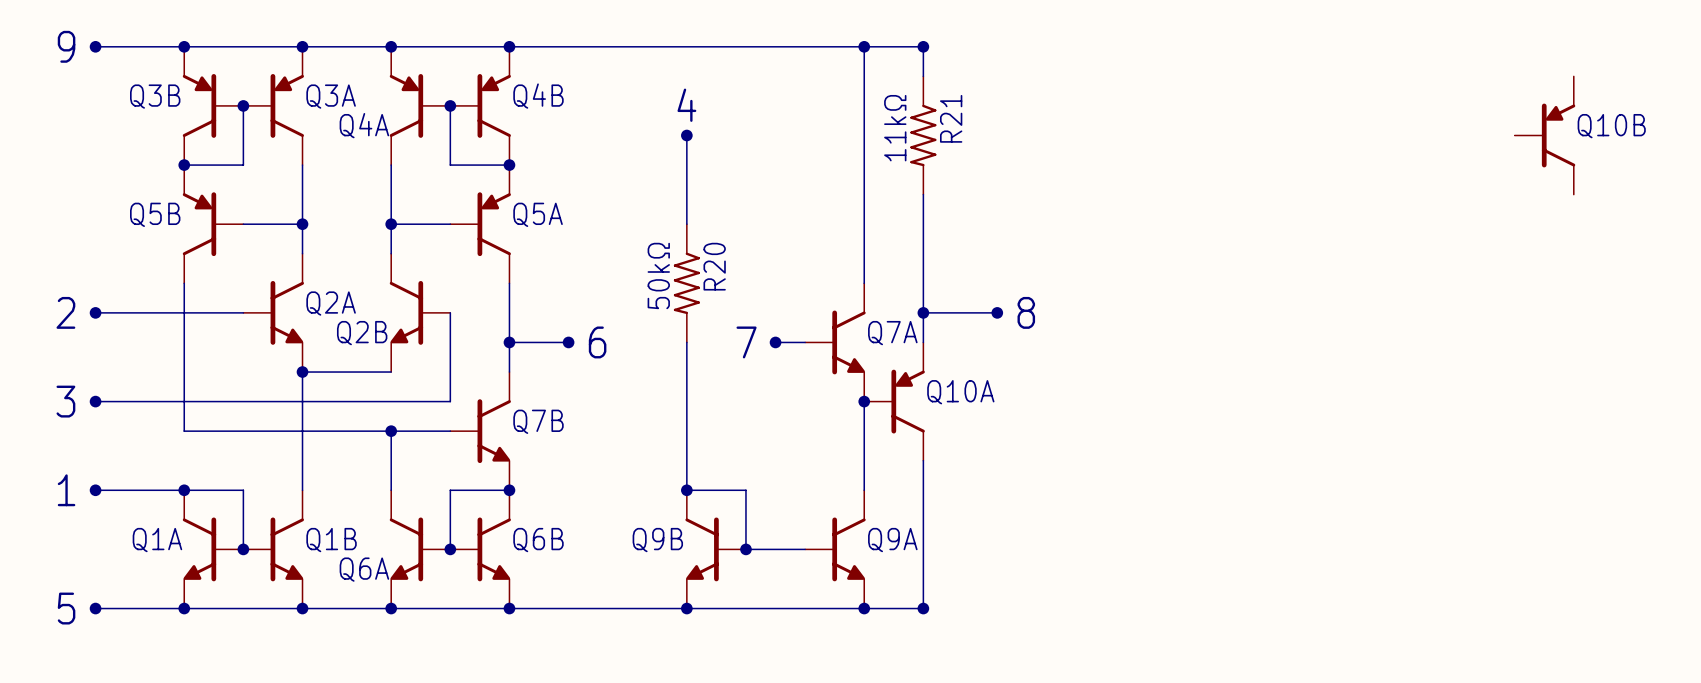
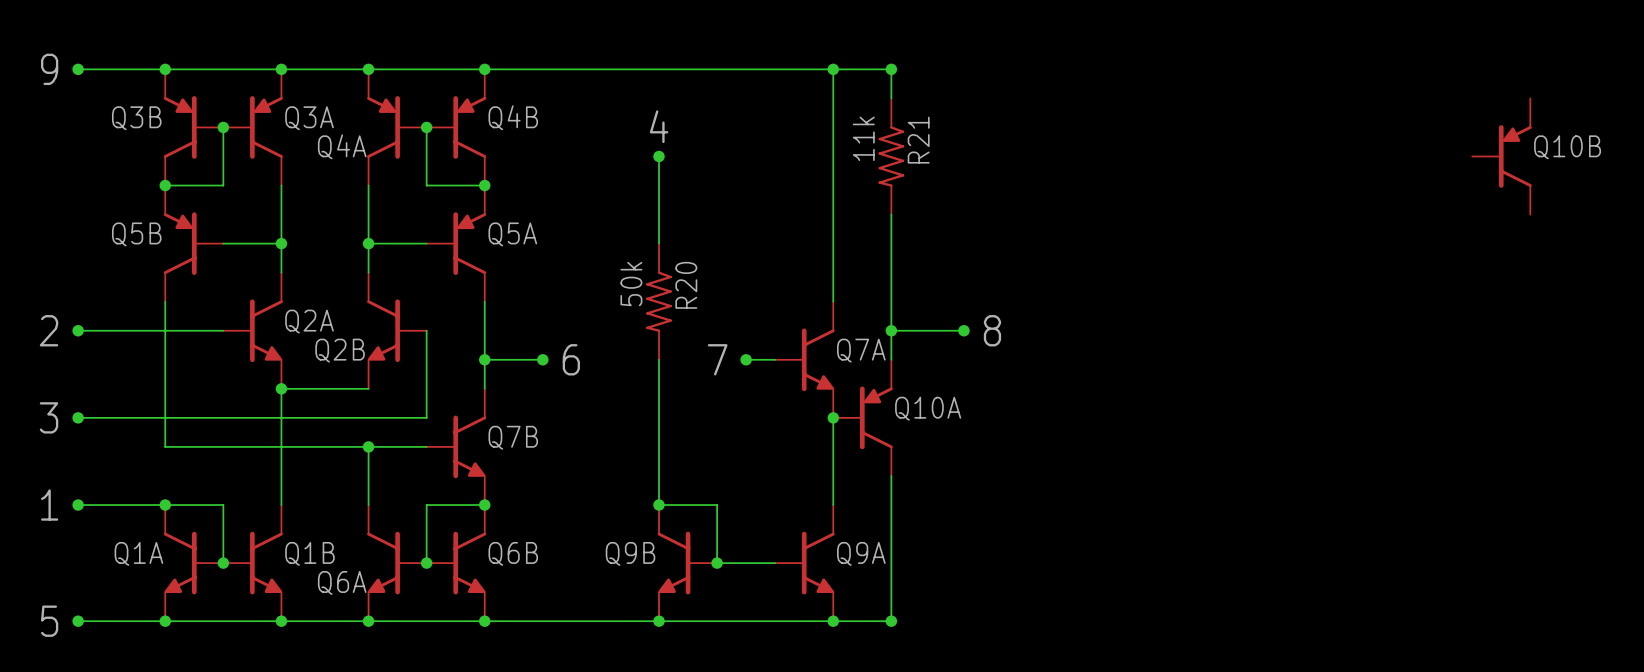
R21 value: 11kΩ (895, 128) -> 11k (863, 138)
R20 value: 50kΩ (658, 275) -> 50k (631, 284)

